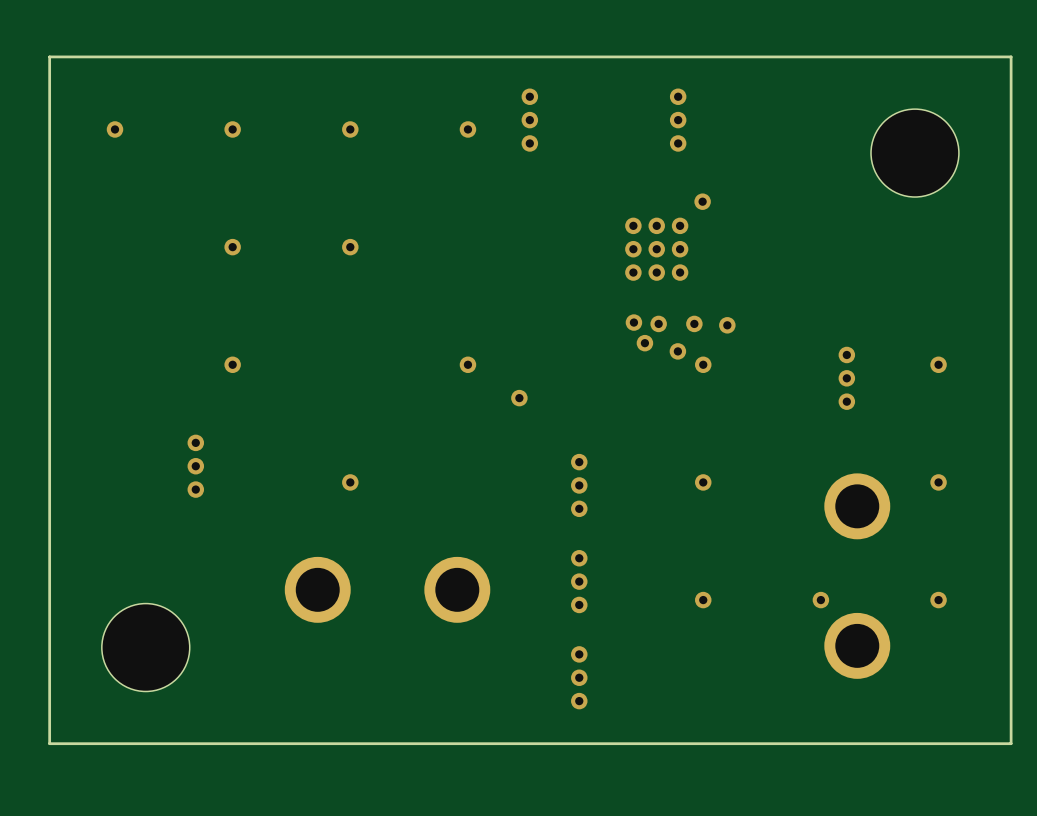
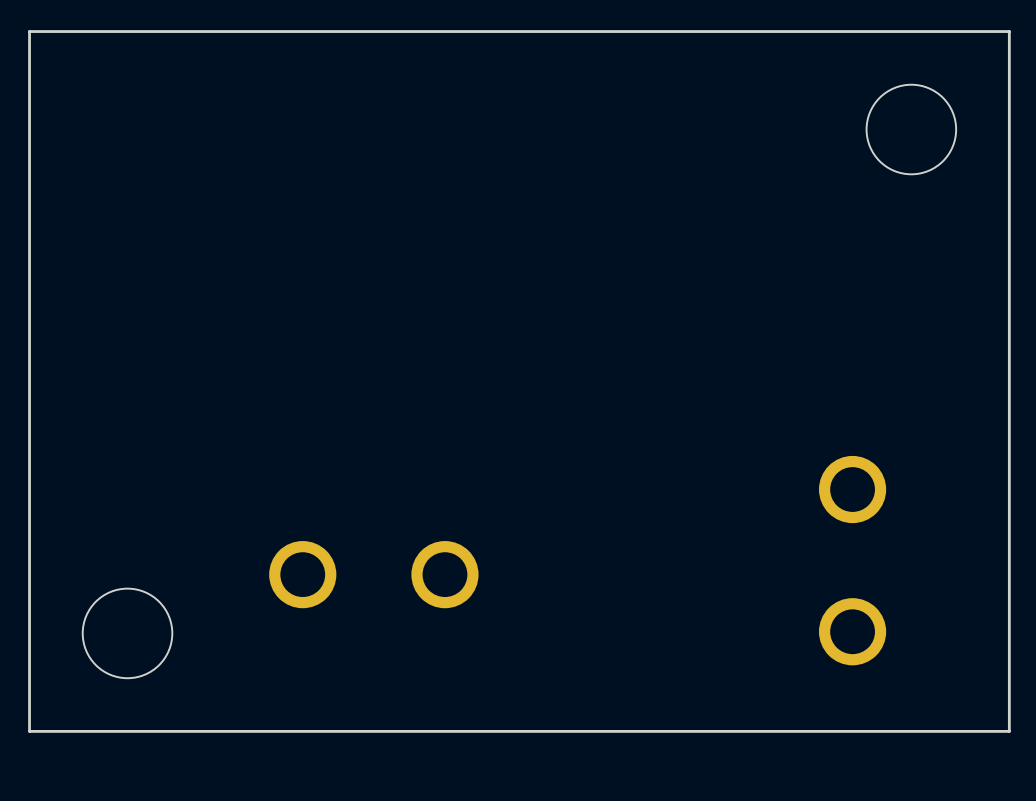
via: (529, 96) -> none
via: (678, 96) -> none
via: (529, 120) -> none
via: (678, 120) -> none
via: (114, 129) -> none
via: (232, 129) -> none
via: (350, 129) -> none
via: (467, 129) -> none
via: (529, 143) -> none
via: (678, 143) -> none
via: (702, 201) -> none
via: (633, 225) -> none
via: (656, 225) -> none
via: (680, 225) -> none
via: (232, 247) -> none
via: (350, 247) -> none
via: (633, 249) -> none
via: (656, 249) -> none
via: (680, 249) -> none
via: (633, 272) -> none
via: (656, 272) -> none
via: (680, 272) -> none
via: (633, 322) -> none
via: (658, 323) -> none
via: (694, 323) -> none
via: (727, 325) -> none
via: (644, 343) -> none
via: (677, 351) -> none
via: (846, 354) -> none
via: (232, 364) -> none
via: (467, 364) -> none
via: (703, 364) -> none
via: (938, 364) -> none
via: (846, 378) -> none
via: (519, 398) -> none
via: (846, 401) -> none
via: (195, 442) -> none
via: (579, 462) -> none
via: (195, 466) -> none
via: (350, 482) -> none
via: (703, 482) -> none
via: (938, 482) -> none
via: (579, 485) -> none
via: (195, 489) -> none
via: (579, 508) -> none
via: (579, 558) -> none
via: (579, 581) -> none
via: (703, 600) -> none
via: (820, 600) -> none
via: (938, 600) -> none
via: (579, 604) -> none
via: (579, 654) -> none
via: (579, 677) -> none
via: (579, 701) -> none

